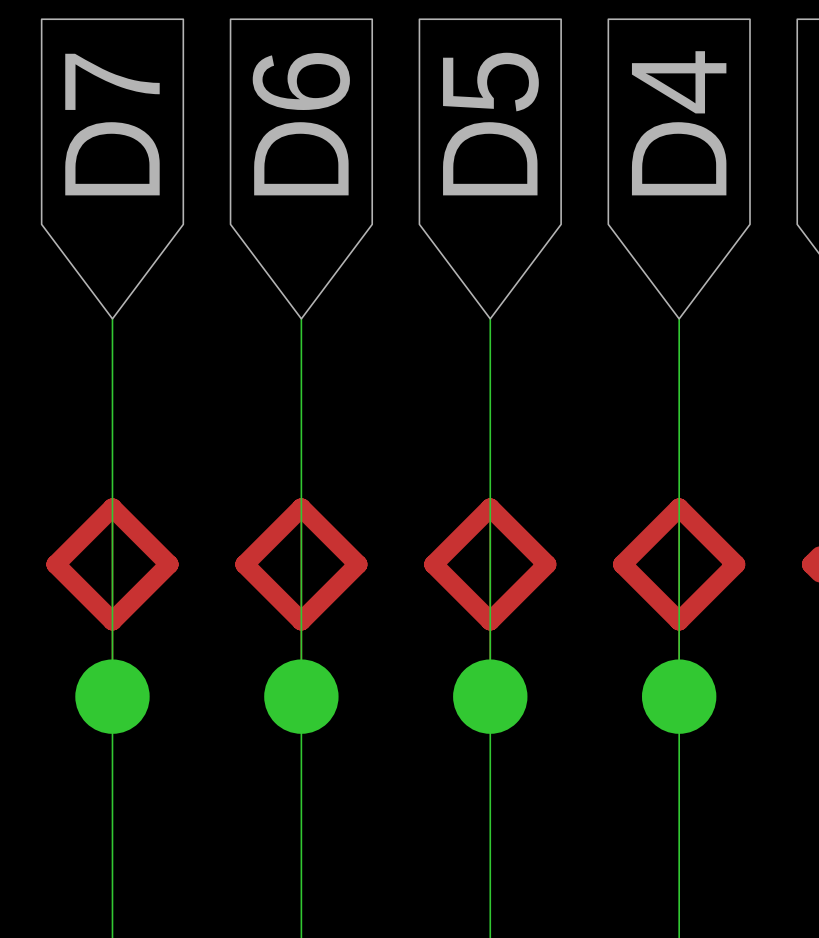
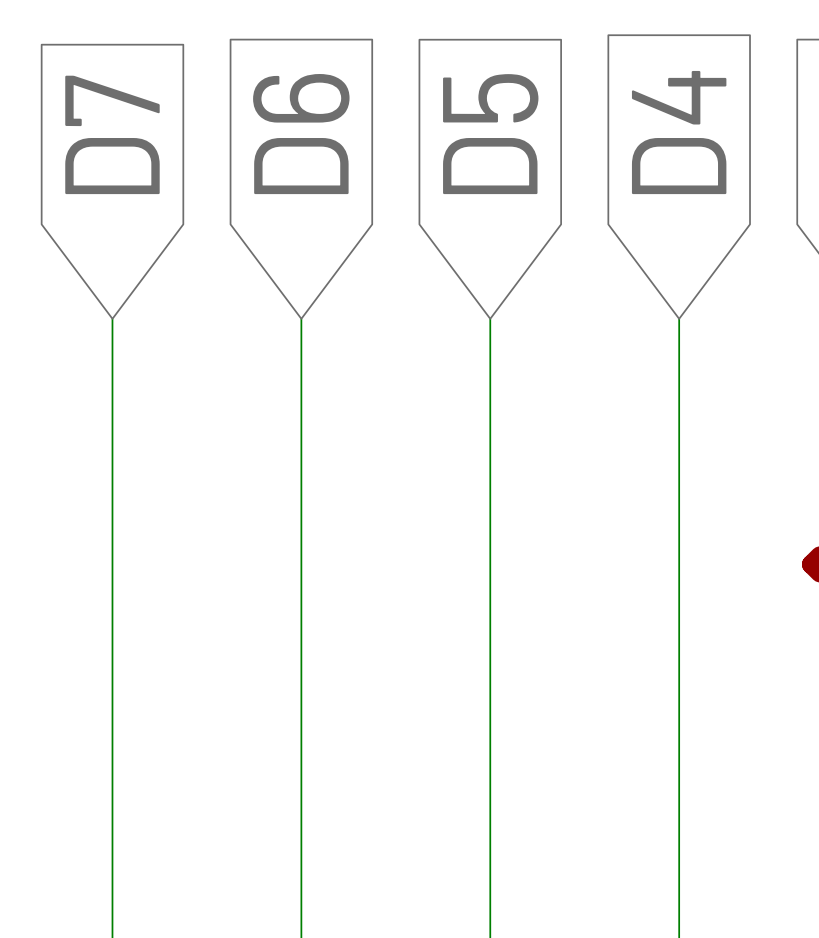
part: (112, 597) -> none
part: (301, 597) -> none
part: (490, 597) -> none
part: (679, 597) -> none
junction: (112, 696) -> none
junction: (301, 696) -> none
junction: (490, 696) -> none
junction: (679, 696) -> none

